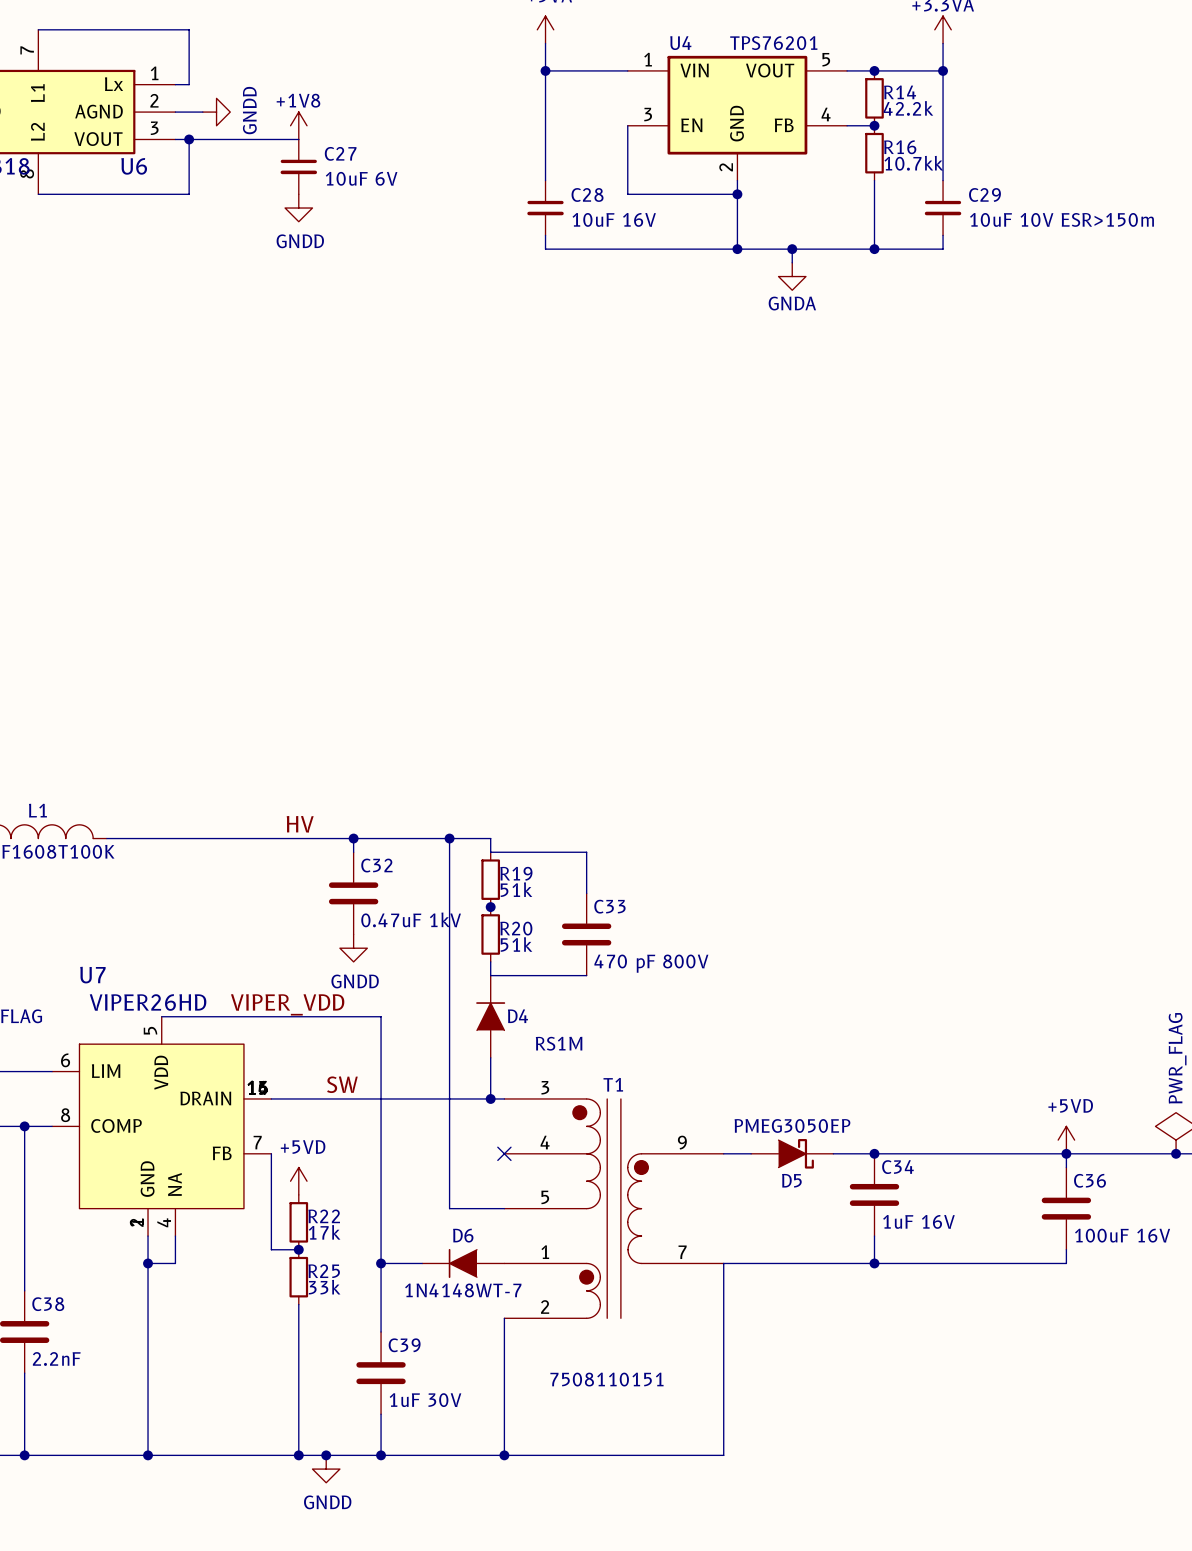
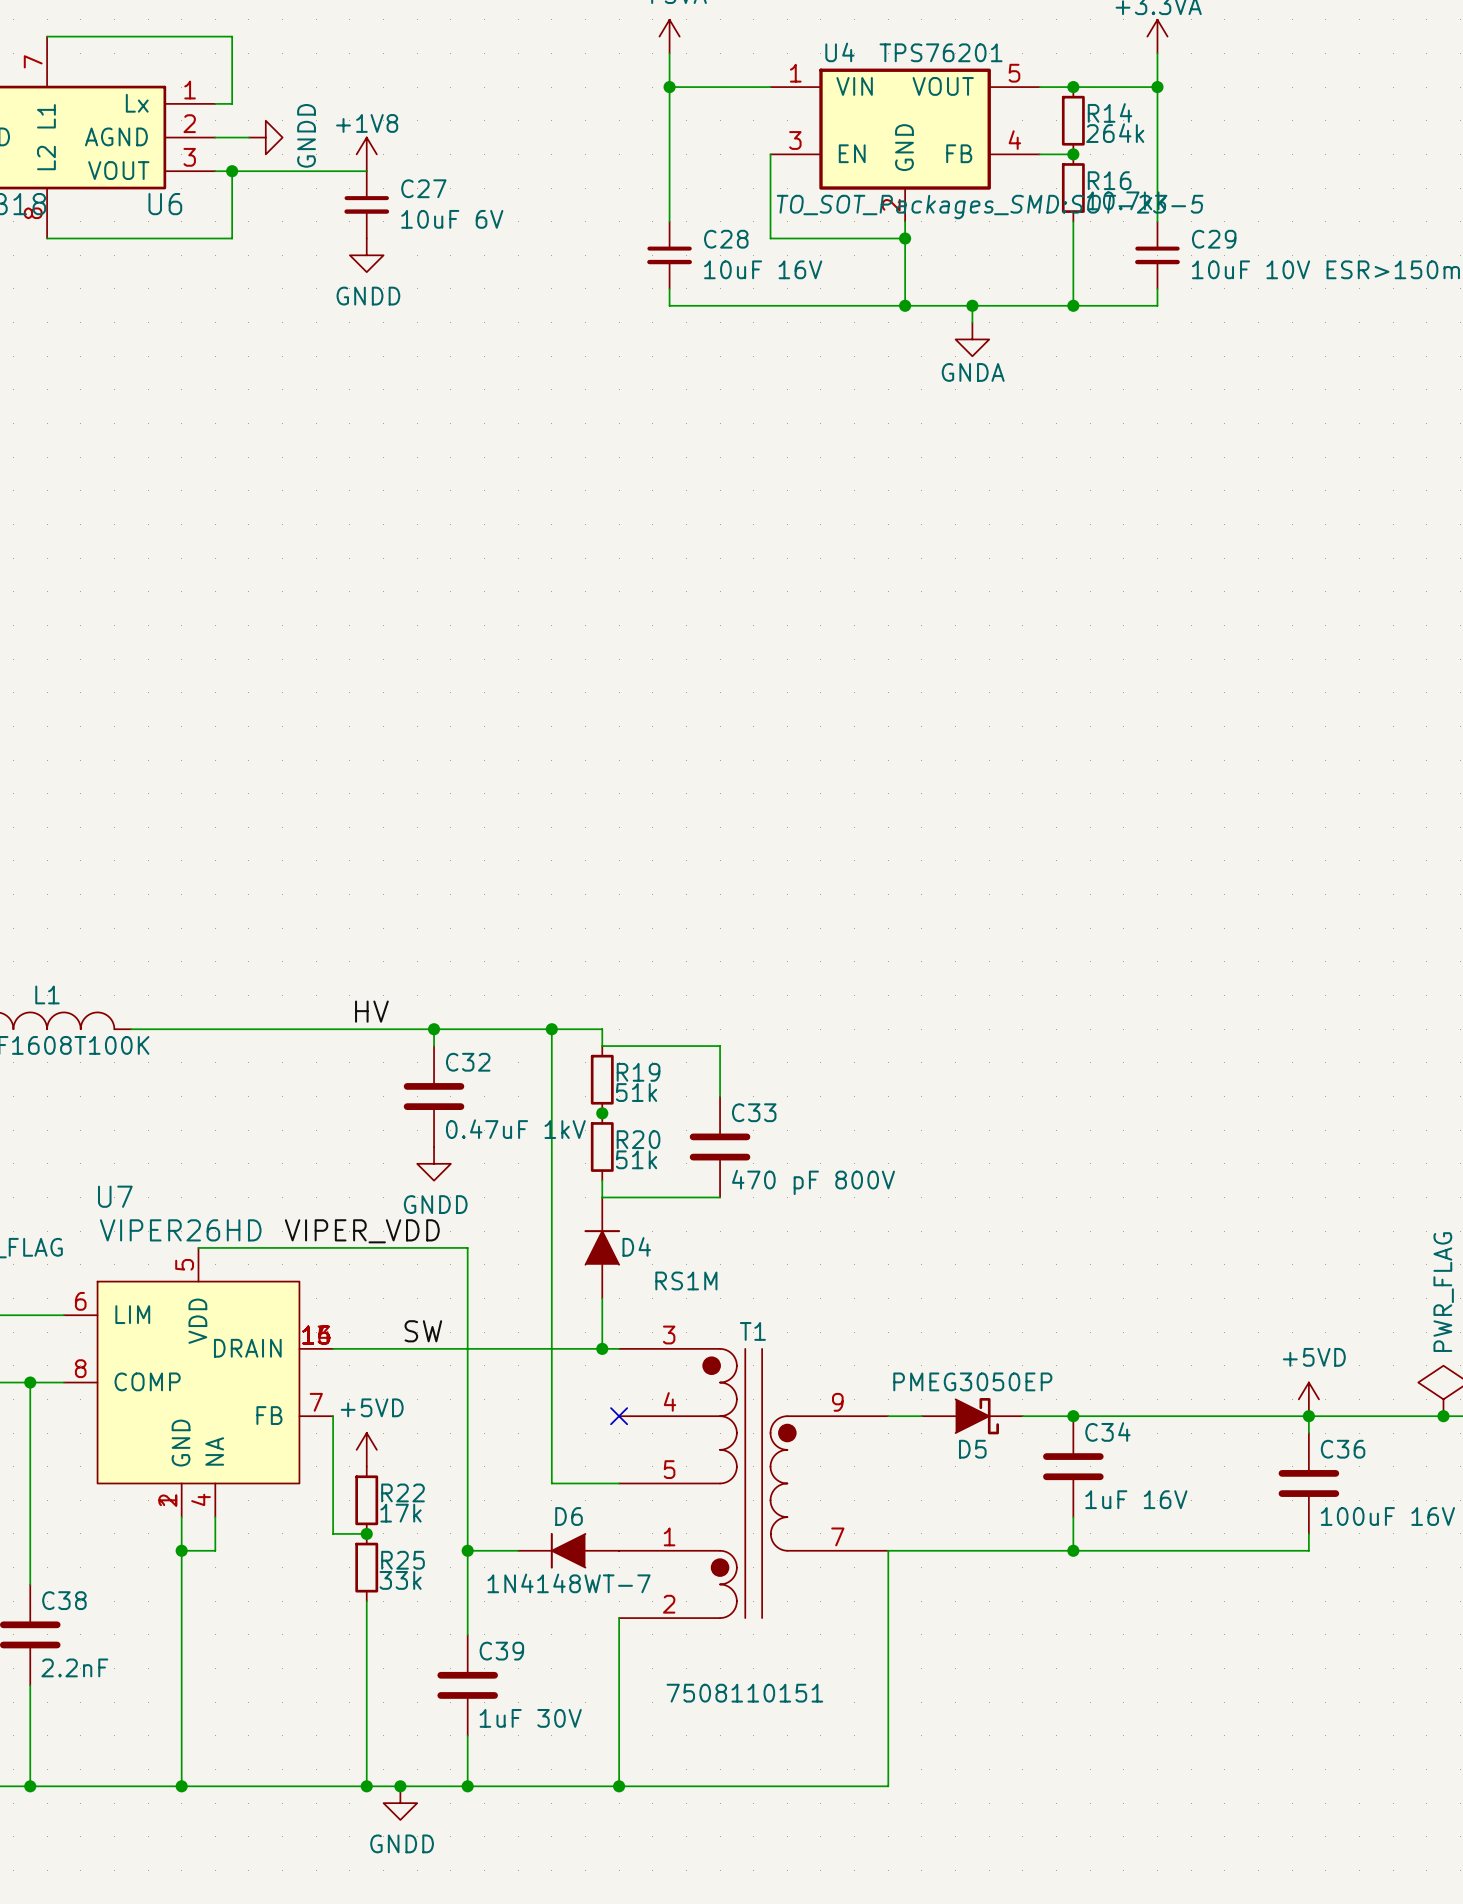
R14 value: 42.2k (908, 108) -> 264k (1115, 133)
U4 text: none -> TO_SOT_Packages_SMD:SOT-23-5 (990, 207)

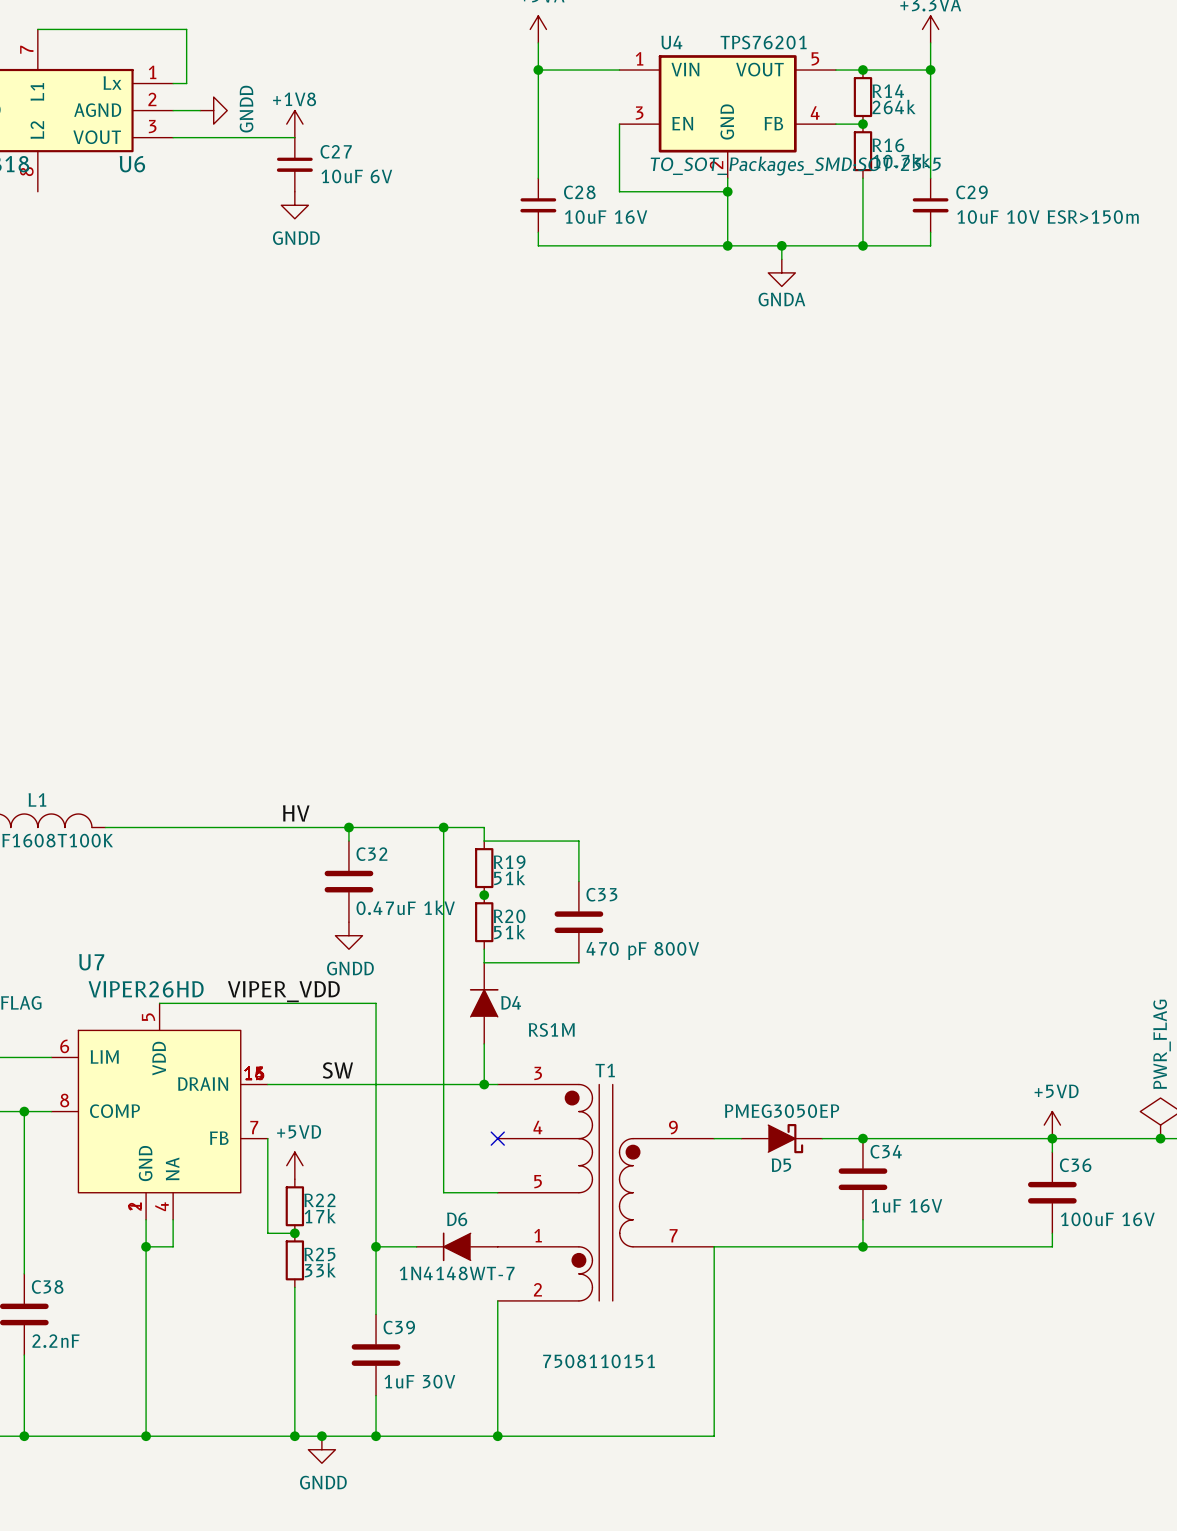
wire: (232, 171) (232, 238) (47, 238) -> none
junction: (232, 171) -> none

